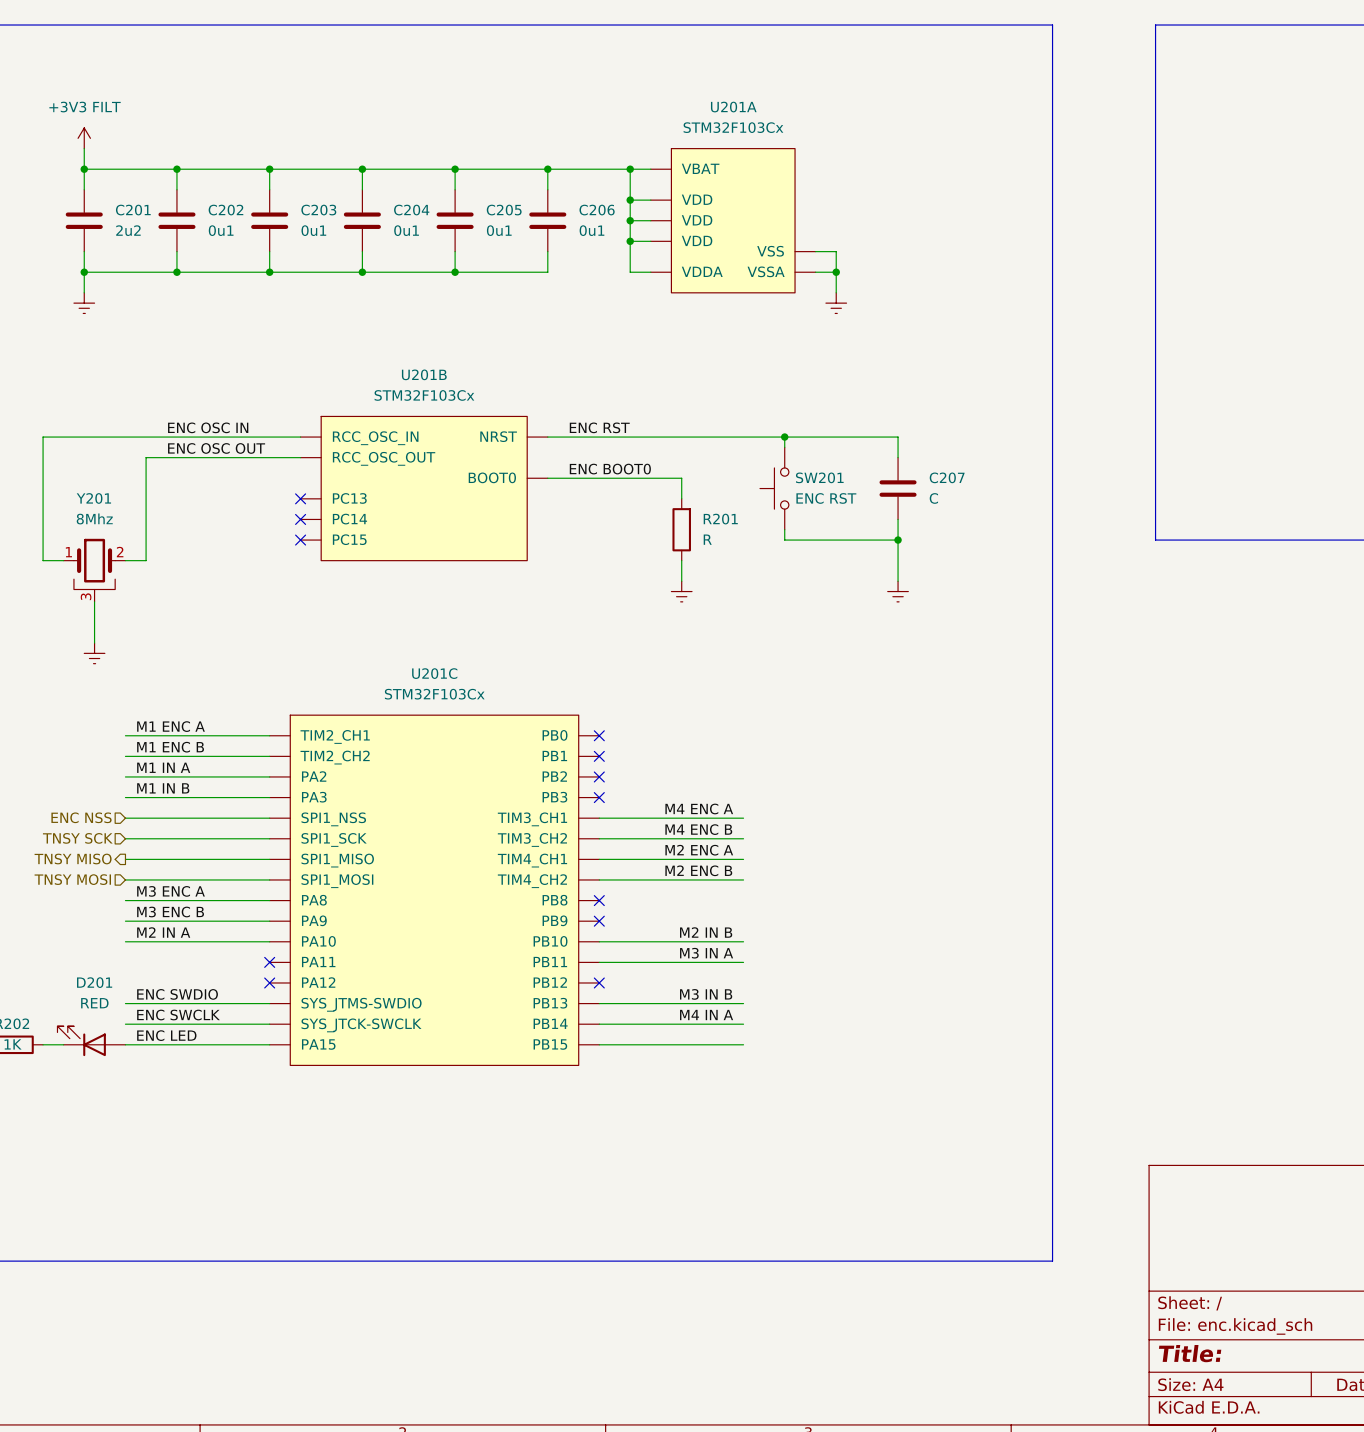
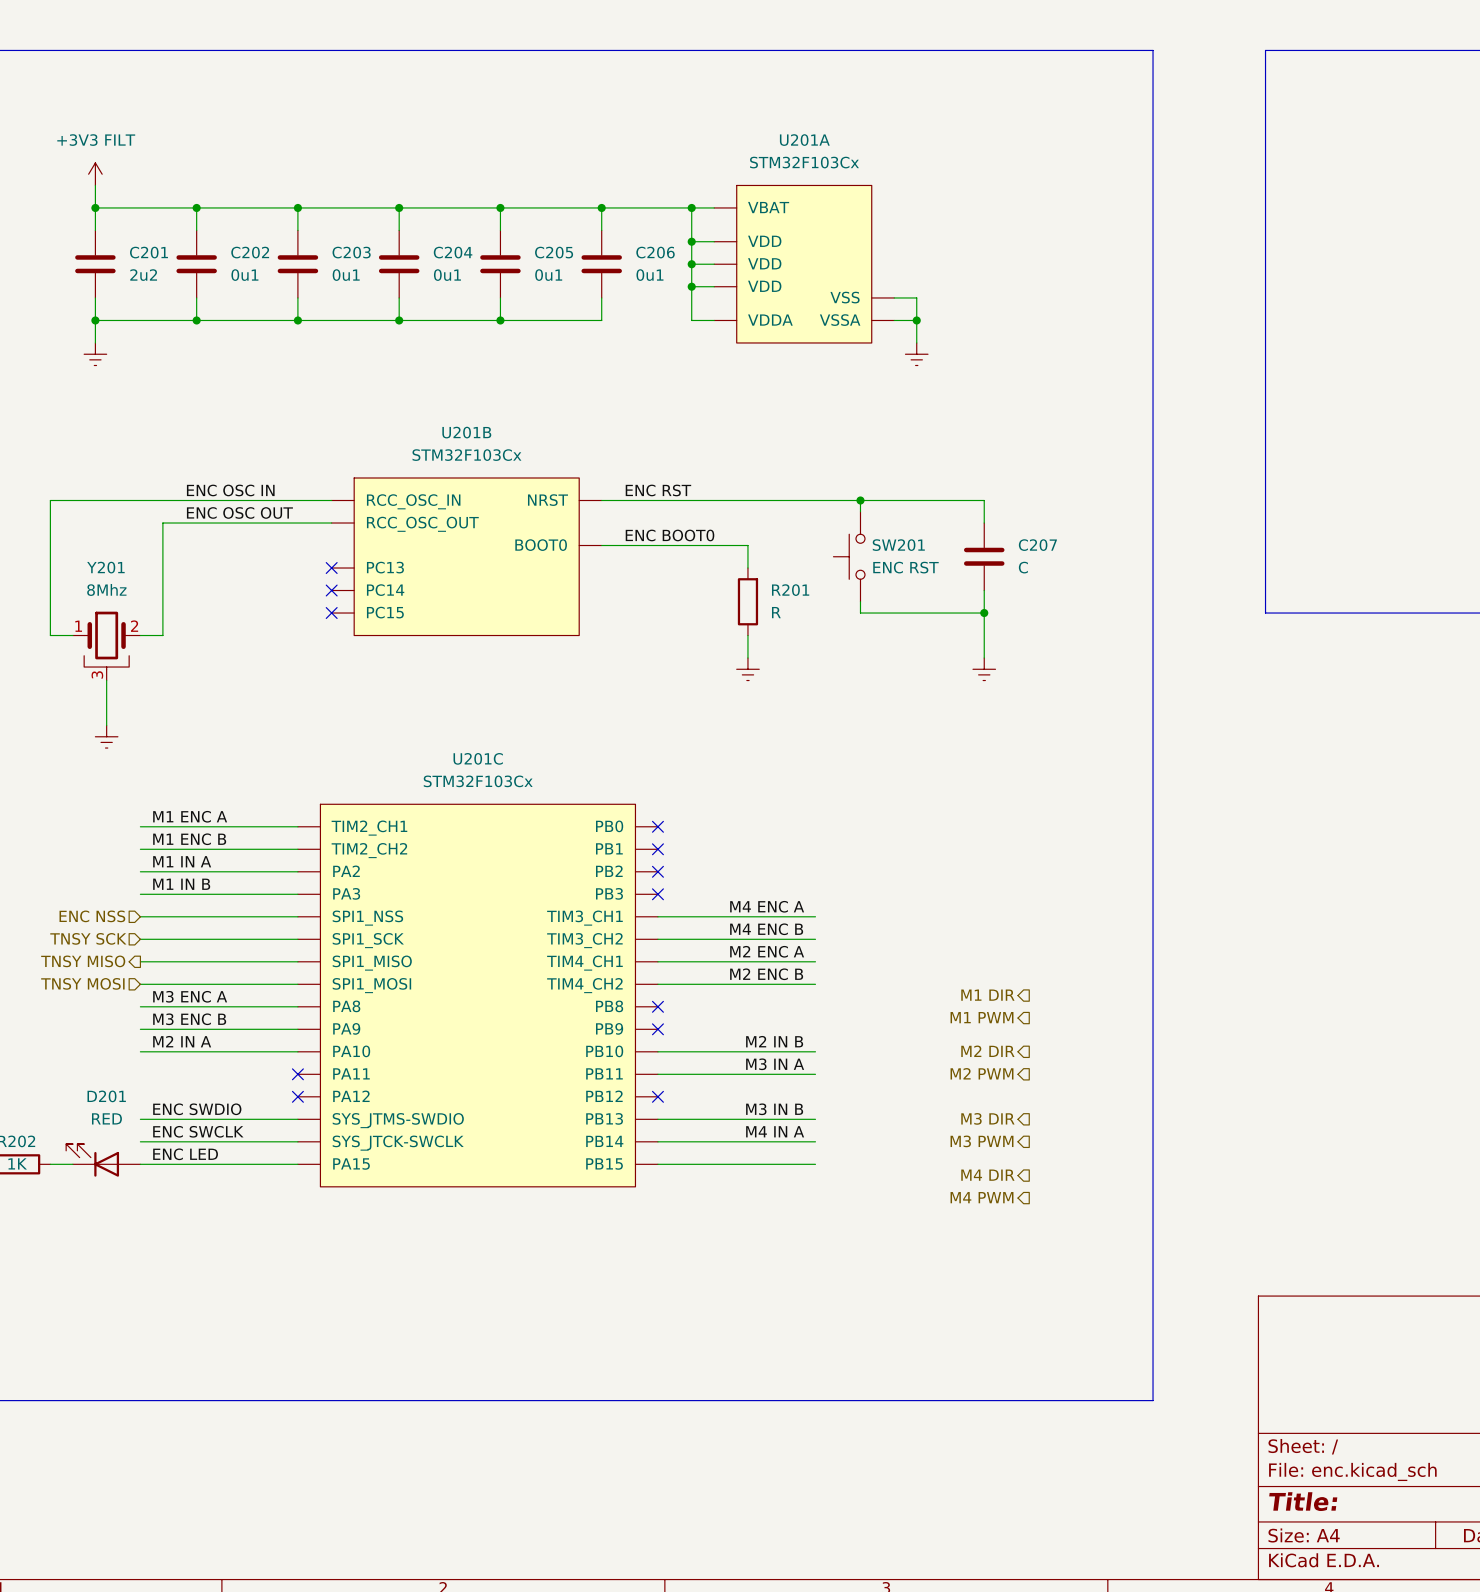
hierarchical label: none -> M1 DIR (987, 995)
hierarchical label: none -> M1 PWM (982, 1017)
hierarchical label: none -> M2 DIR (987, 1051)
hierarchical label: none -> M2 PWM (982, 1073)
hierarchical label: none -> M3 DIR (987, 1118)
hierarchical label: none -> M3 PWM (982, 1141)
hierarchical label: none -> M4 DIR (987, 1175)
hierarchical label: none -> M4 PWM (982, 1197)

